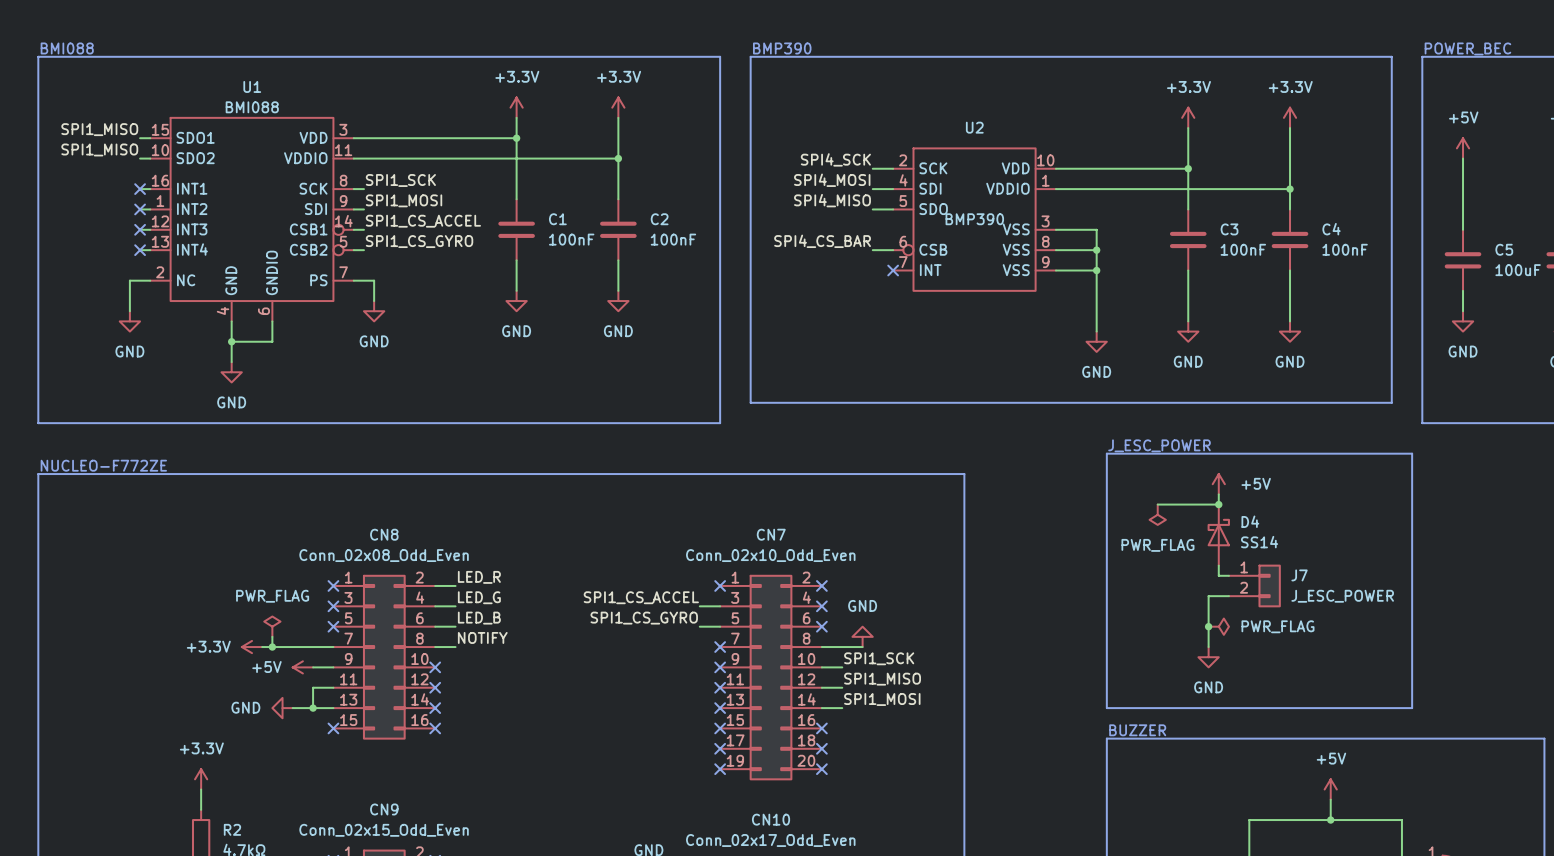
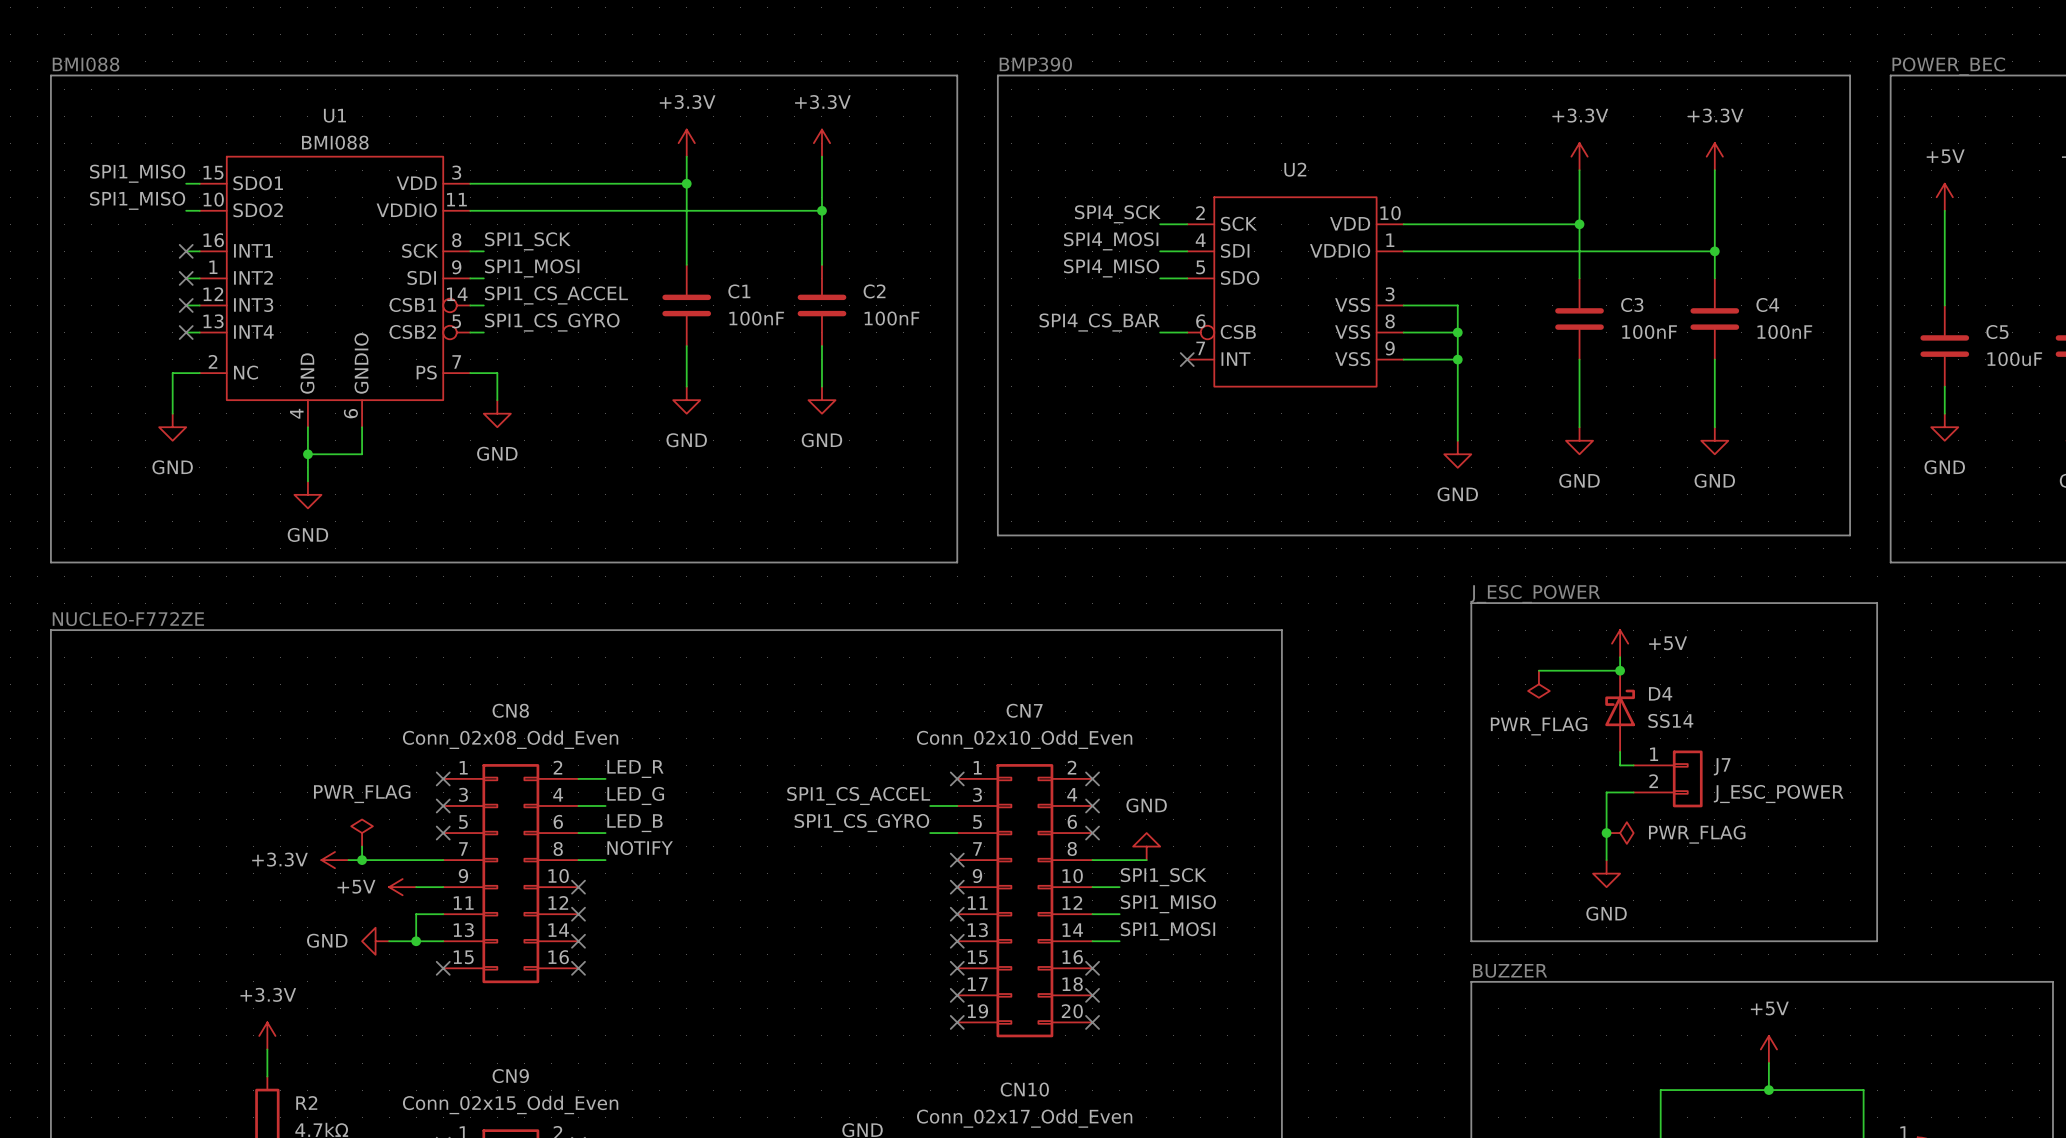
U2 value: BMP390 (974, 219) -> none

